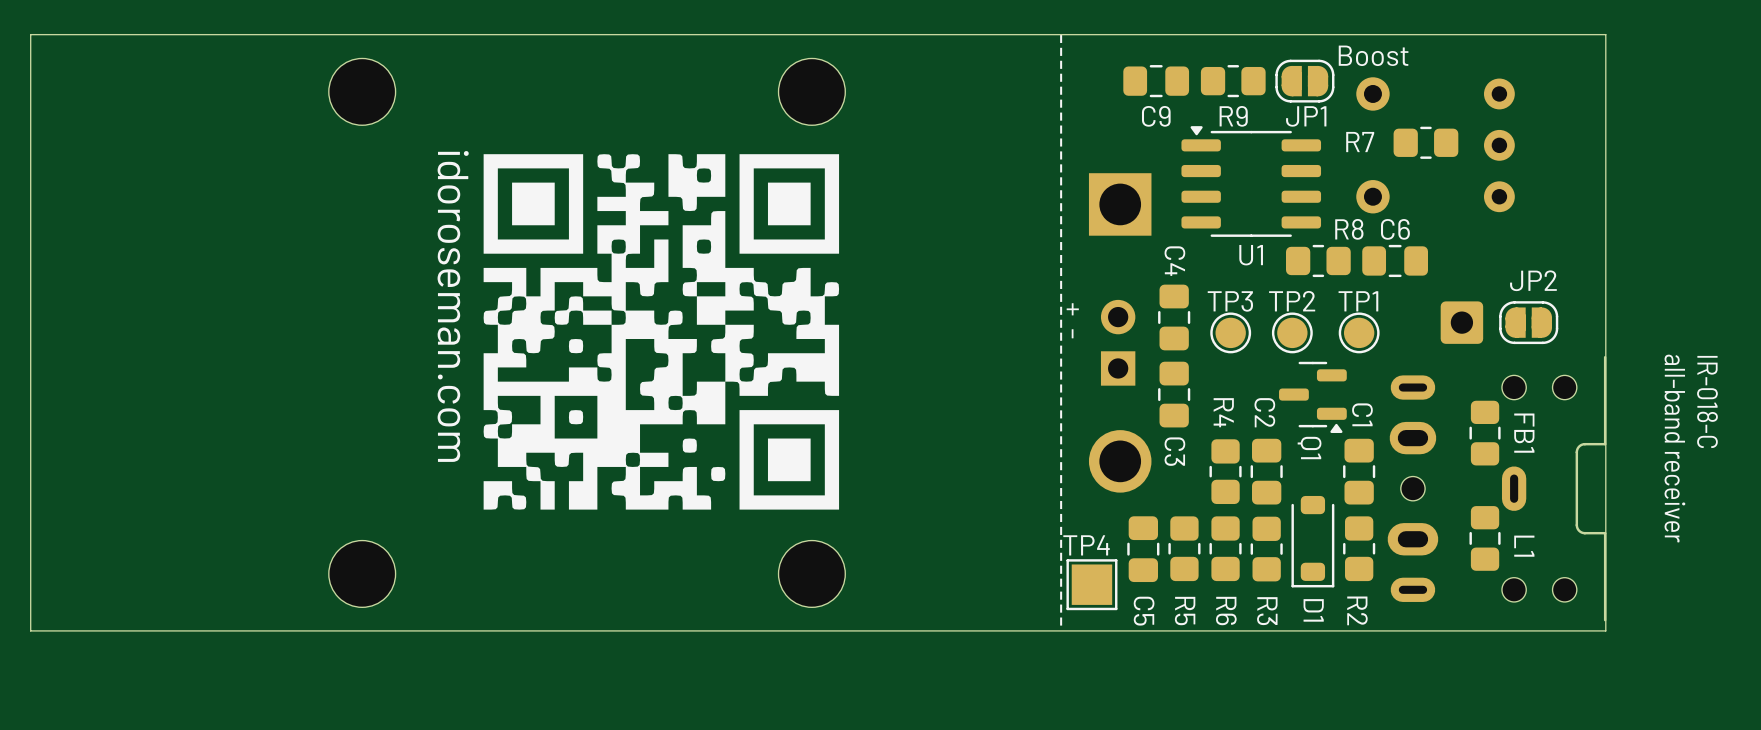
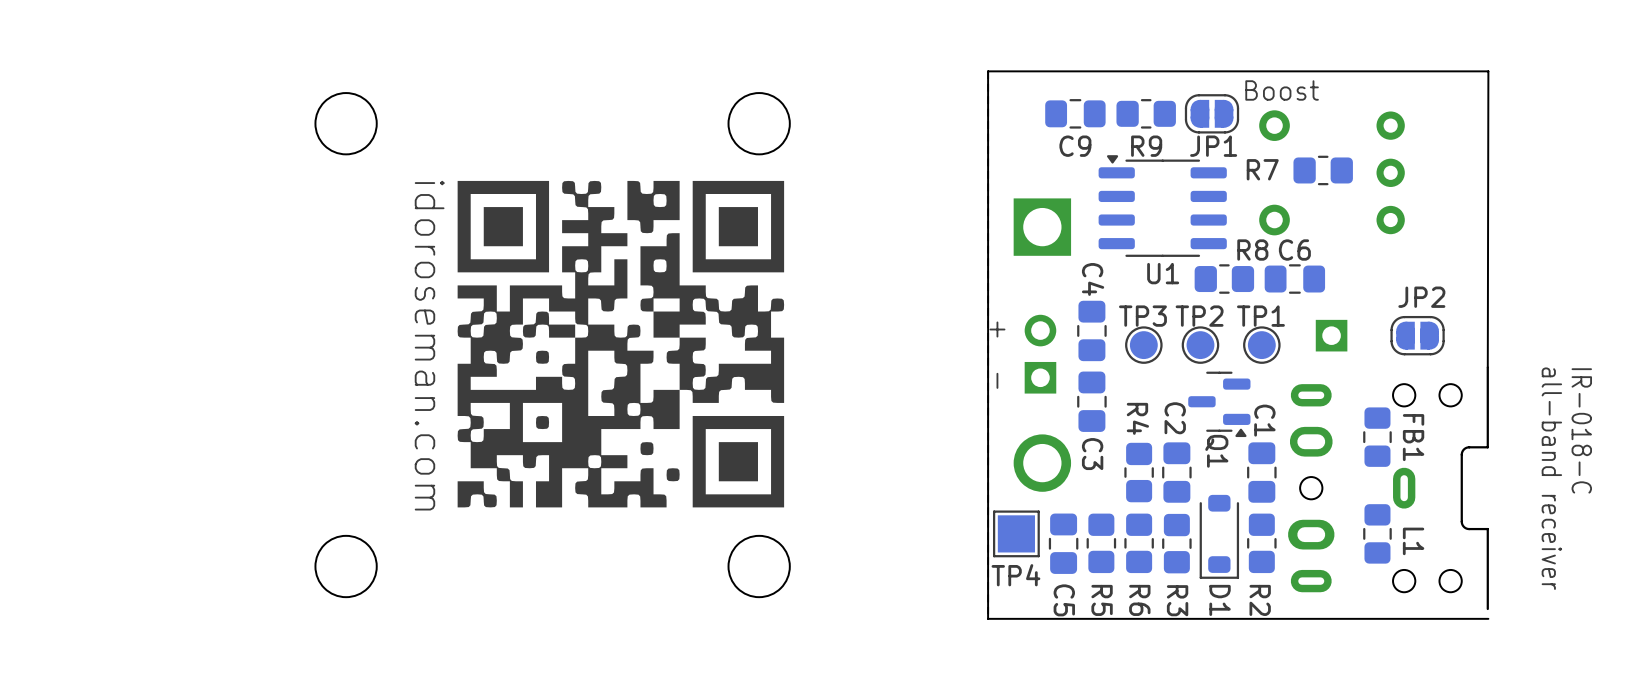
part: none -> (1331, 335)
part: (1461, 322) -> none
TP4 name position: TP4 (1086, 545) -> TP4 (1015, 575)
TP4 position: (1091, 584) -> (1016, 533)
board edge: (1605, 630) (1605, 34) (30, 34) (30, 630) (1061, 630) -> (1487, 367) (1488, 71) (988, 71) (988, 618)

